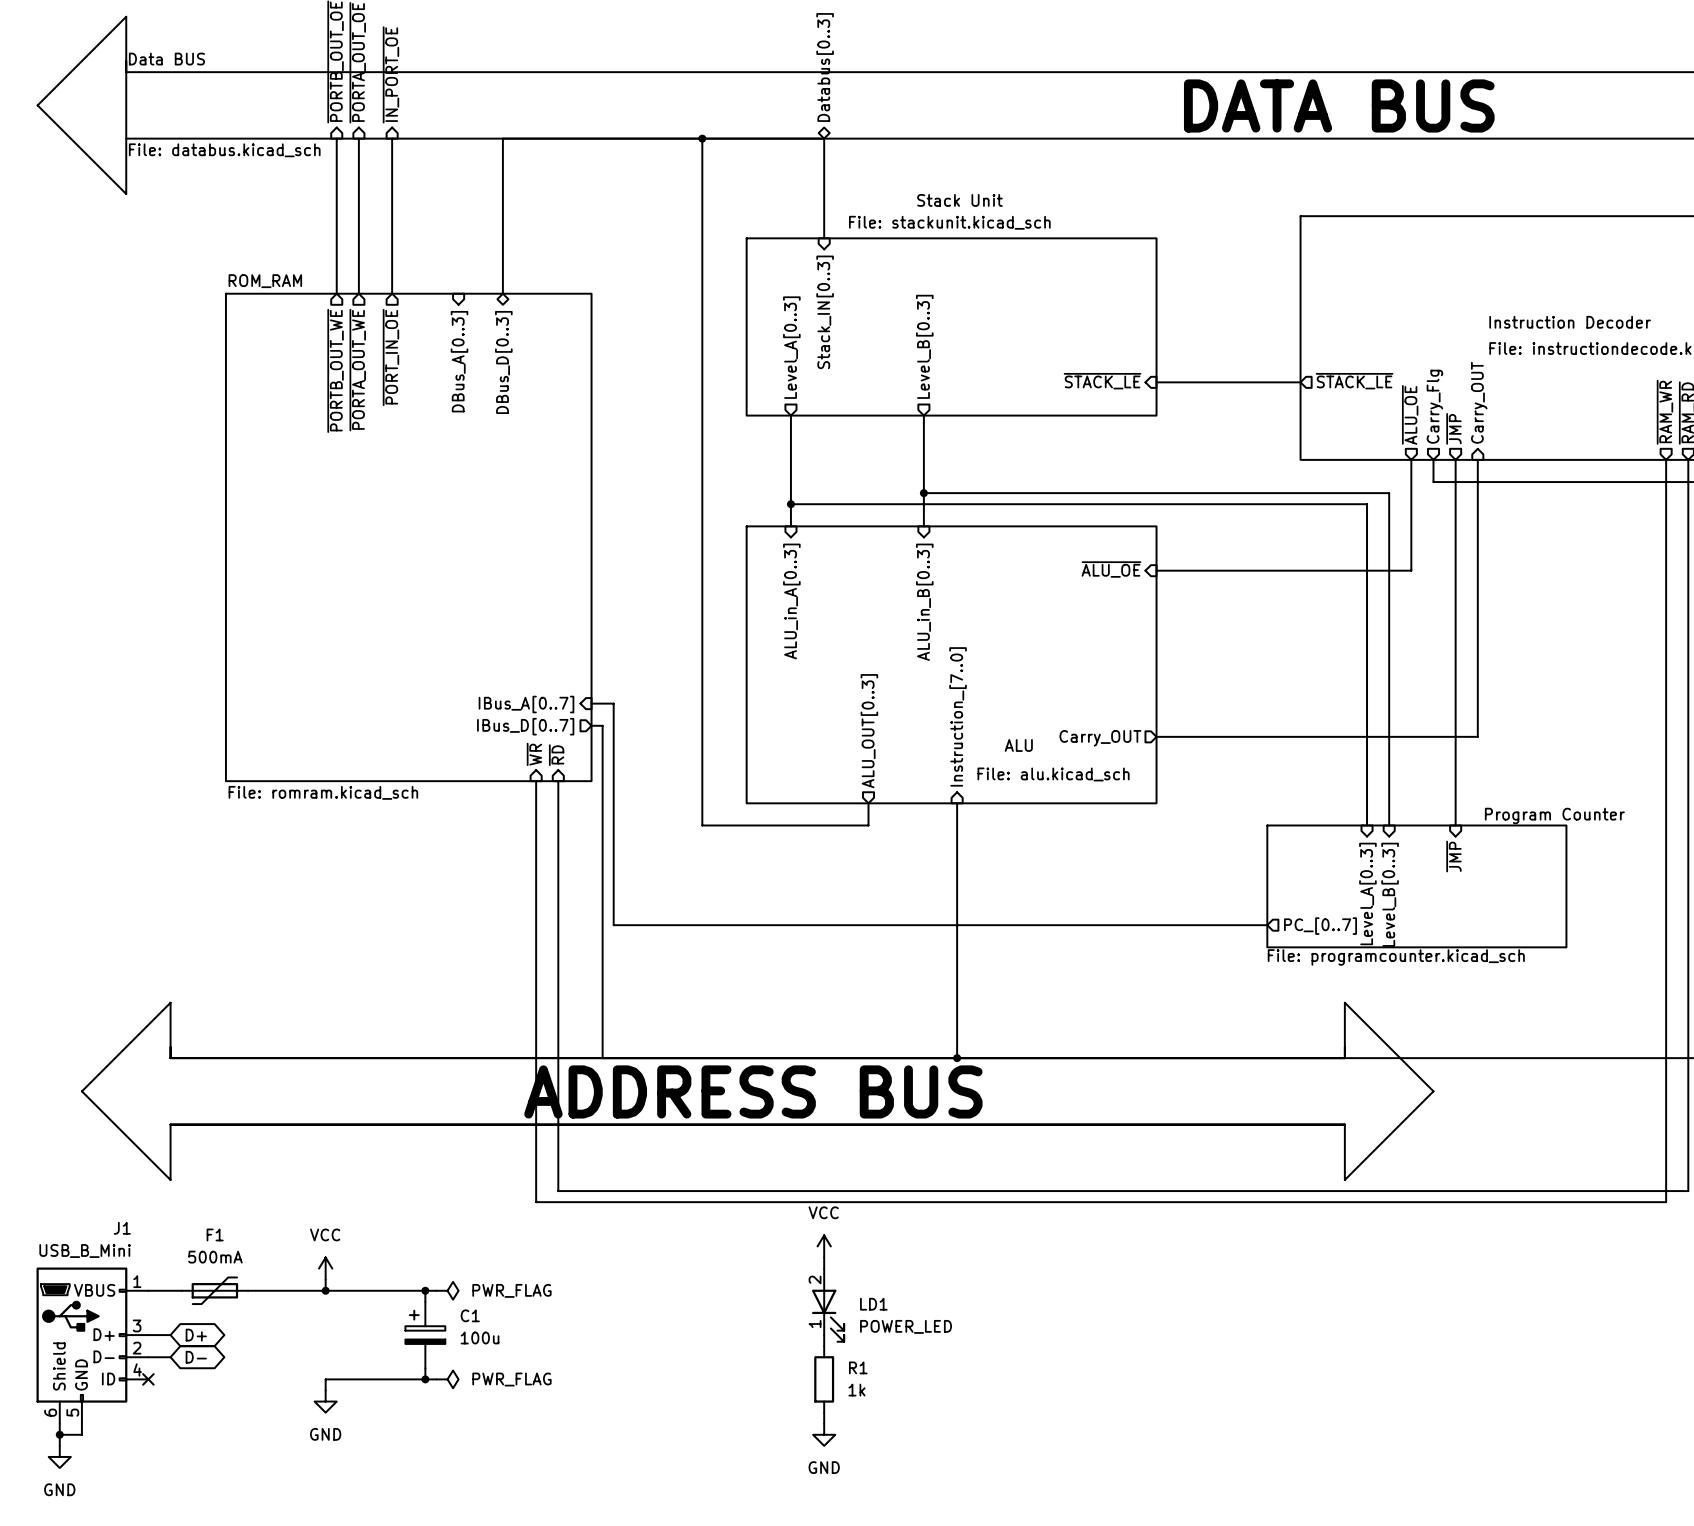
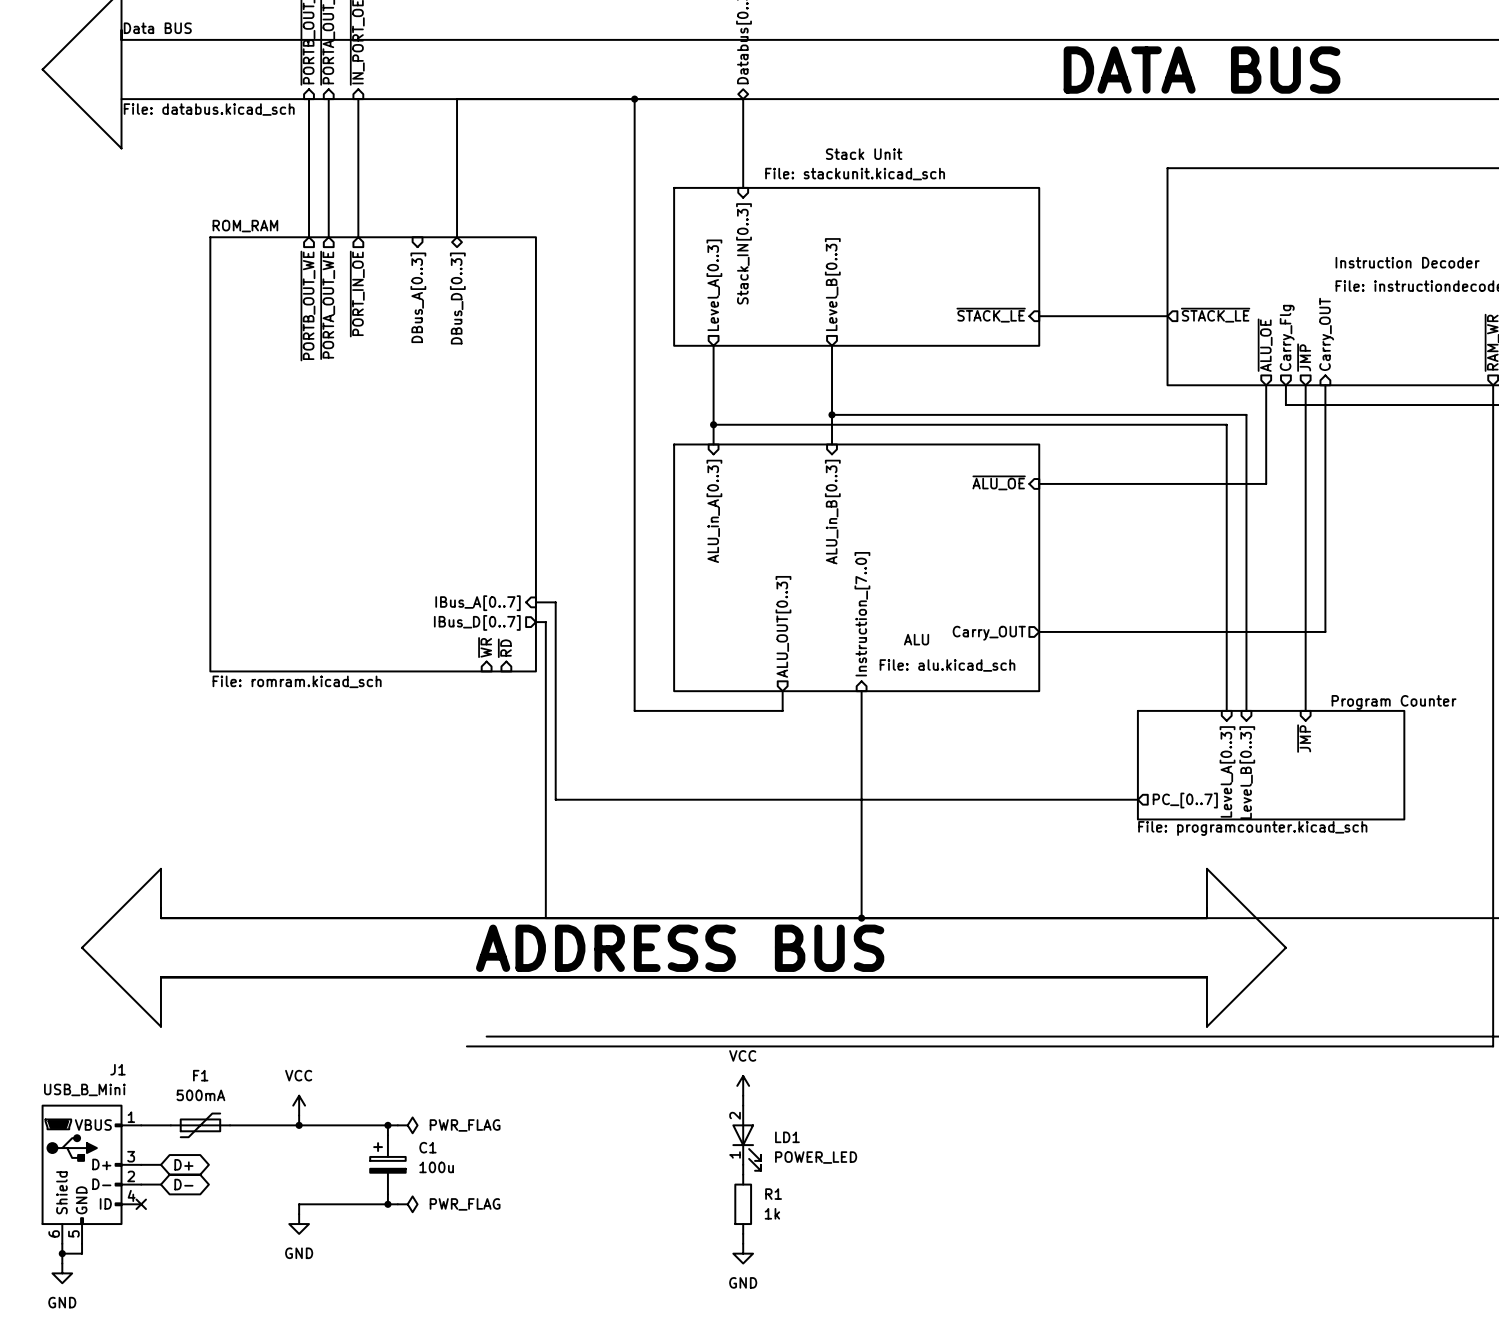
wire: (536, 781) (536, 1202) -> (466, 1046) (486, 1046)
wire: (558, 781) (558, 1191) -> (486, 1036) (506, 1036)

